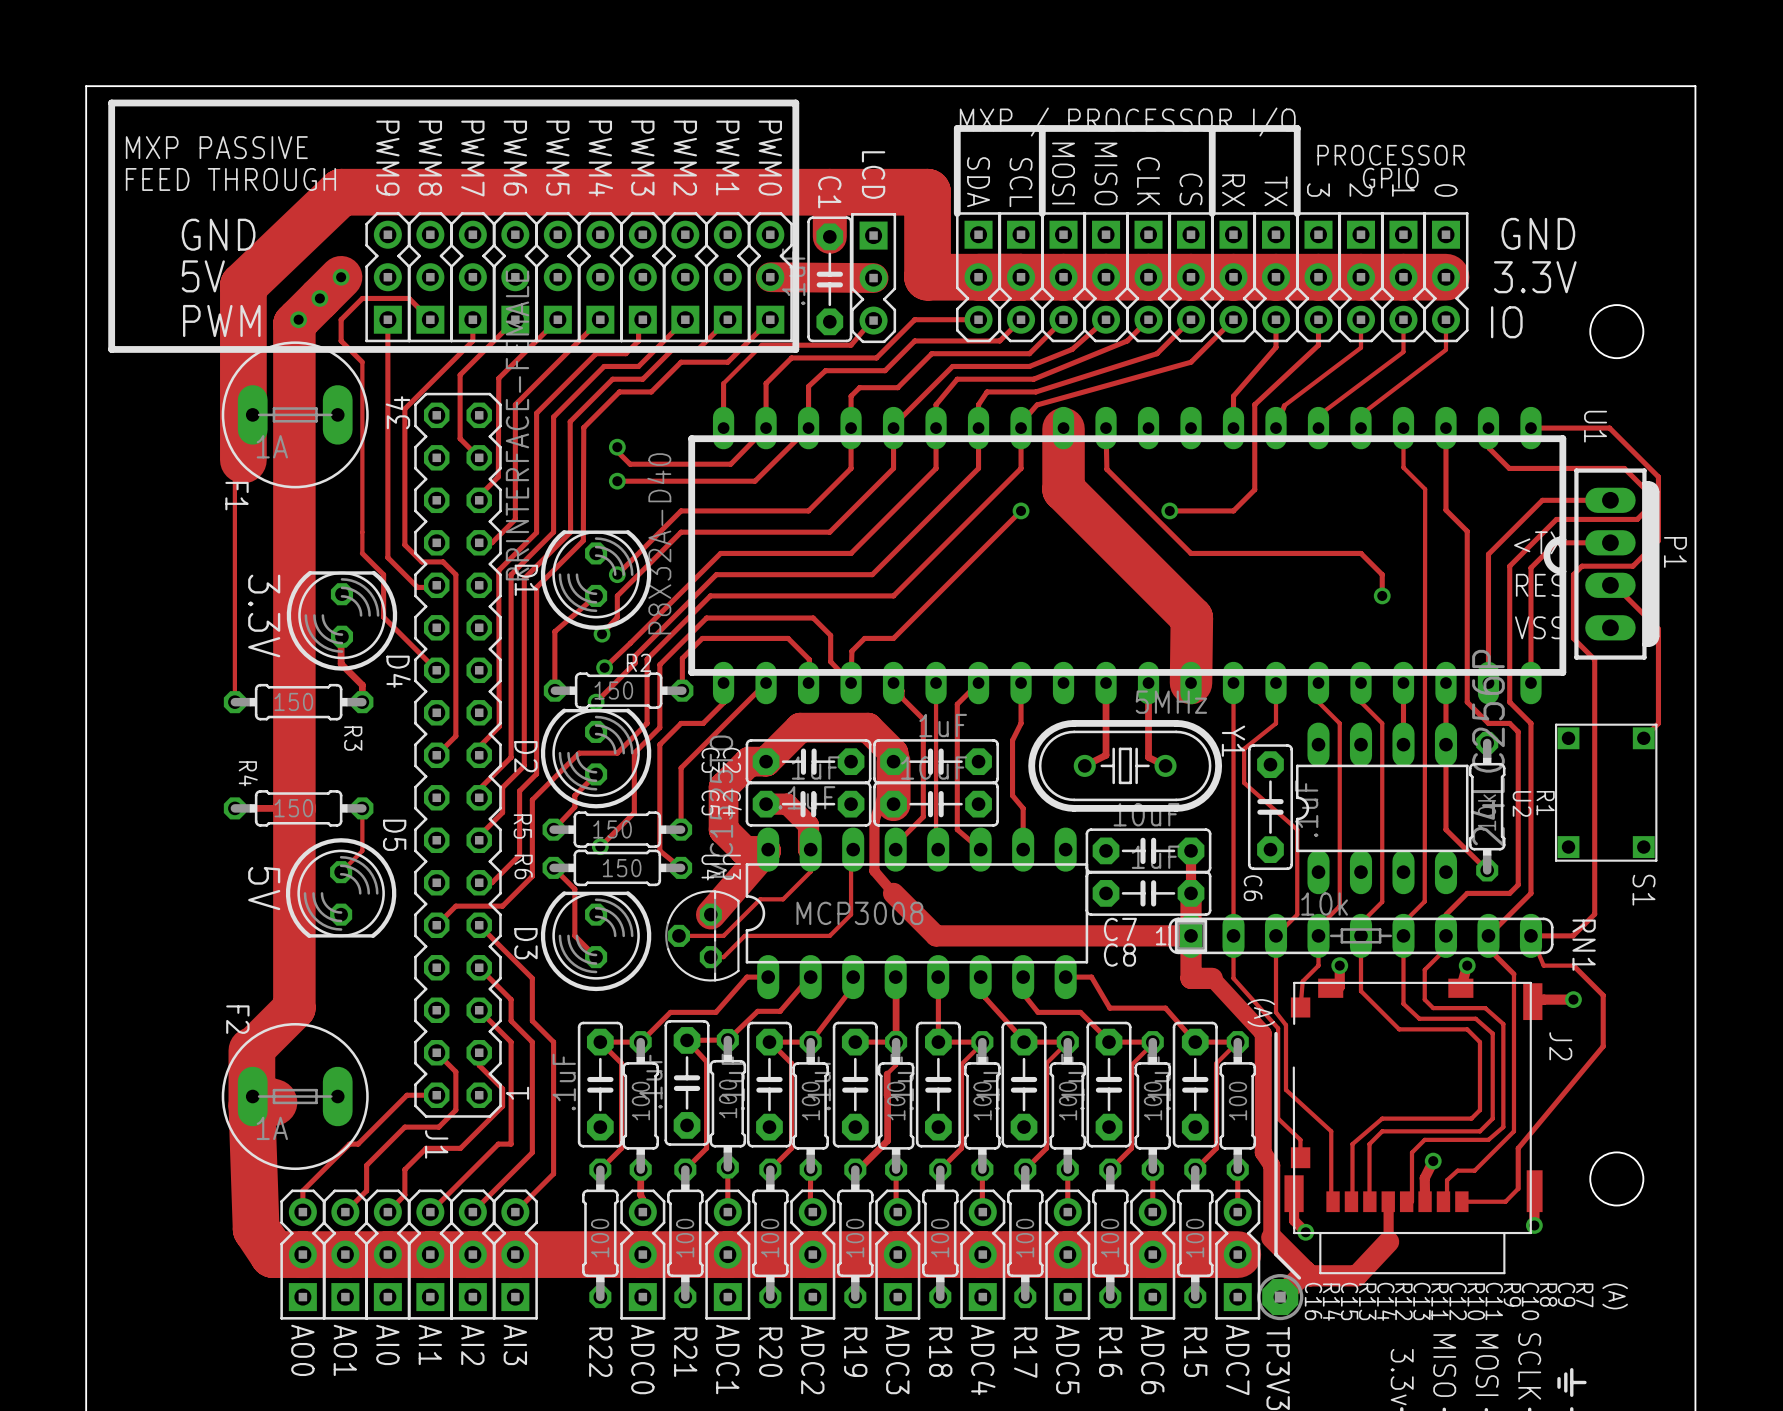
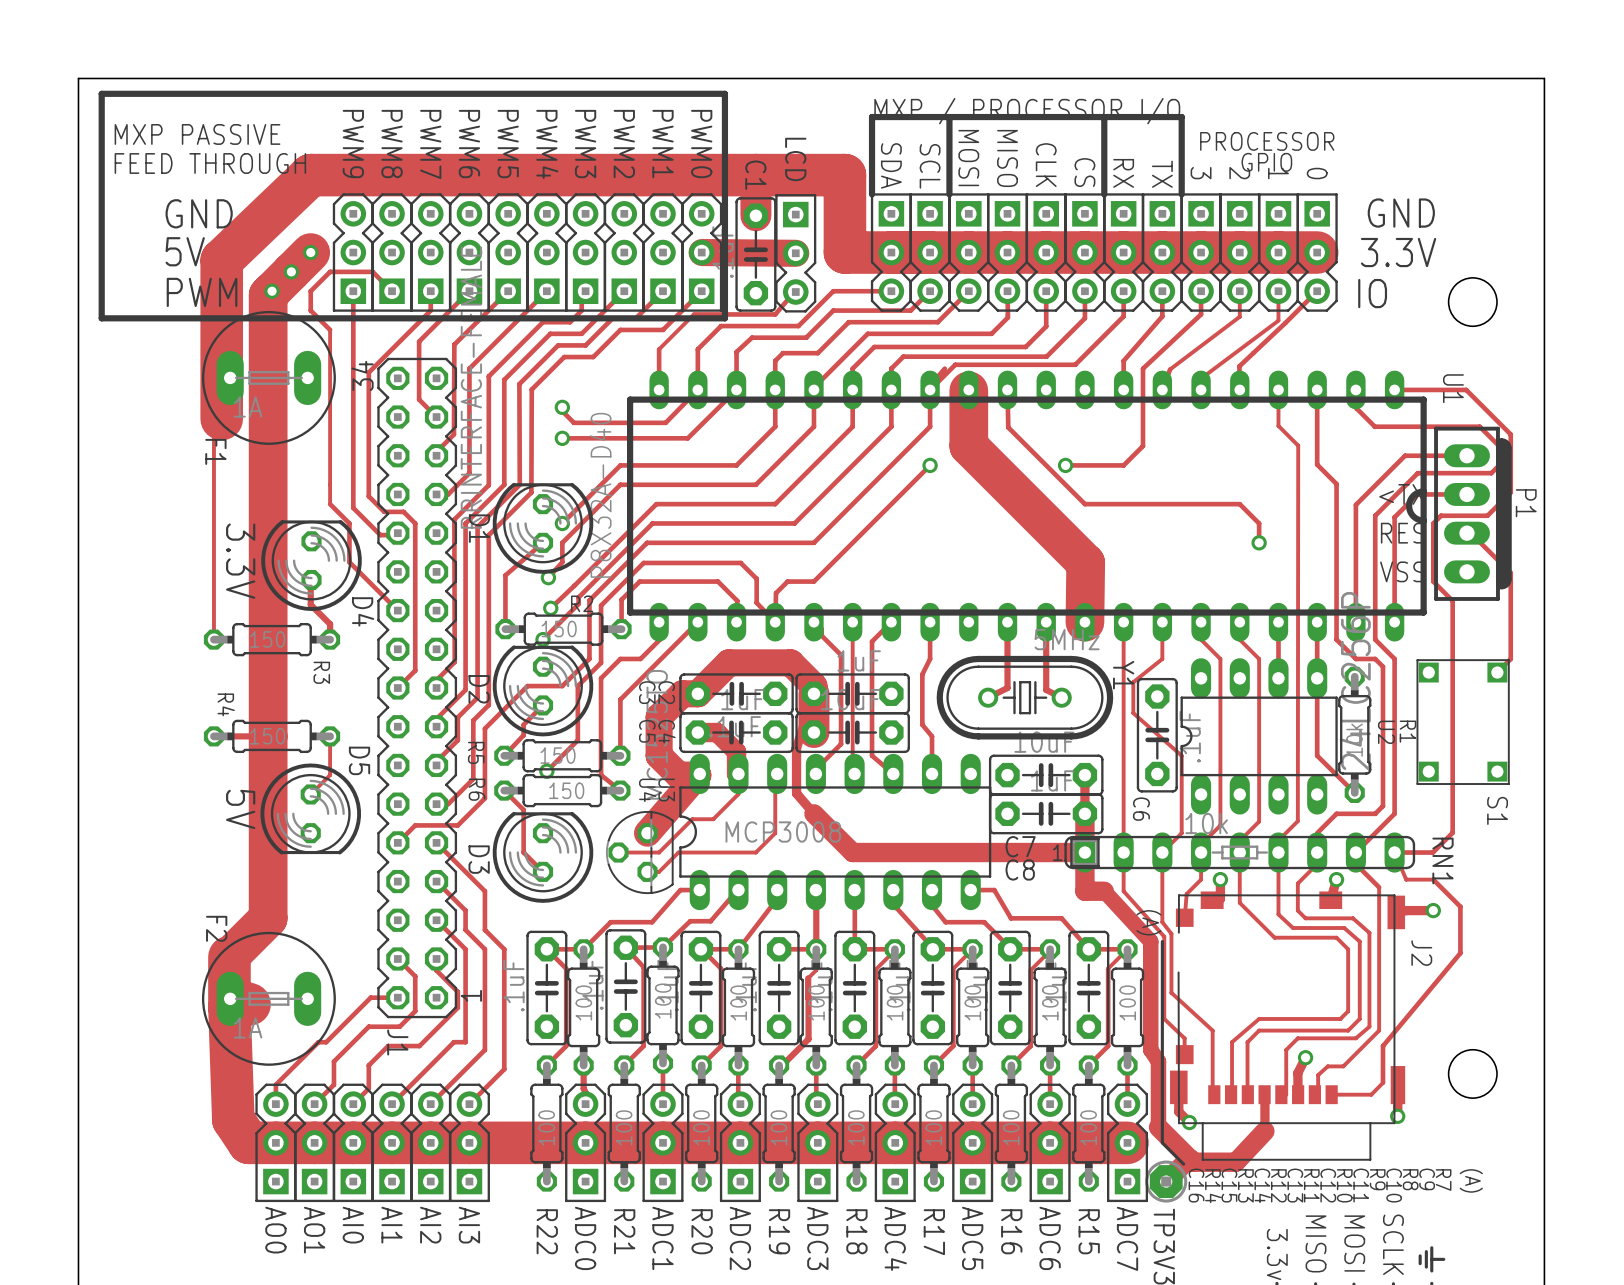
track: (1106, 319) (1072, 349) (1029, 366) -> (1007, 291) (1007, 317) (991, 333) (937, 333)
track: (1148, 319) (1127, 340) (1033, 379) (957, 379) (936, 404) -> (1046, 291) (1046, 326) (1025, 346) (874, 346) (852, 368)
track: (1191, 319) (1157, 353) (1035, 391) (987, 391) (978, 404) -> (1084, 291) (1084, 318) (1046, 356) (903, 356) (891, 368)
track: (1233, 319) (1191, 362) (1038, 404) -> (1123, 291) (1123, 316) (1075, 364) (955, 364) (930, 389)
track: (1445, 319) (1445, 349) -> none
track: (1445, 349) (1365, 411) (1360, 428) -> (1317, 291) (1239, 366) (1239, 389)

